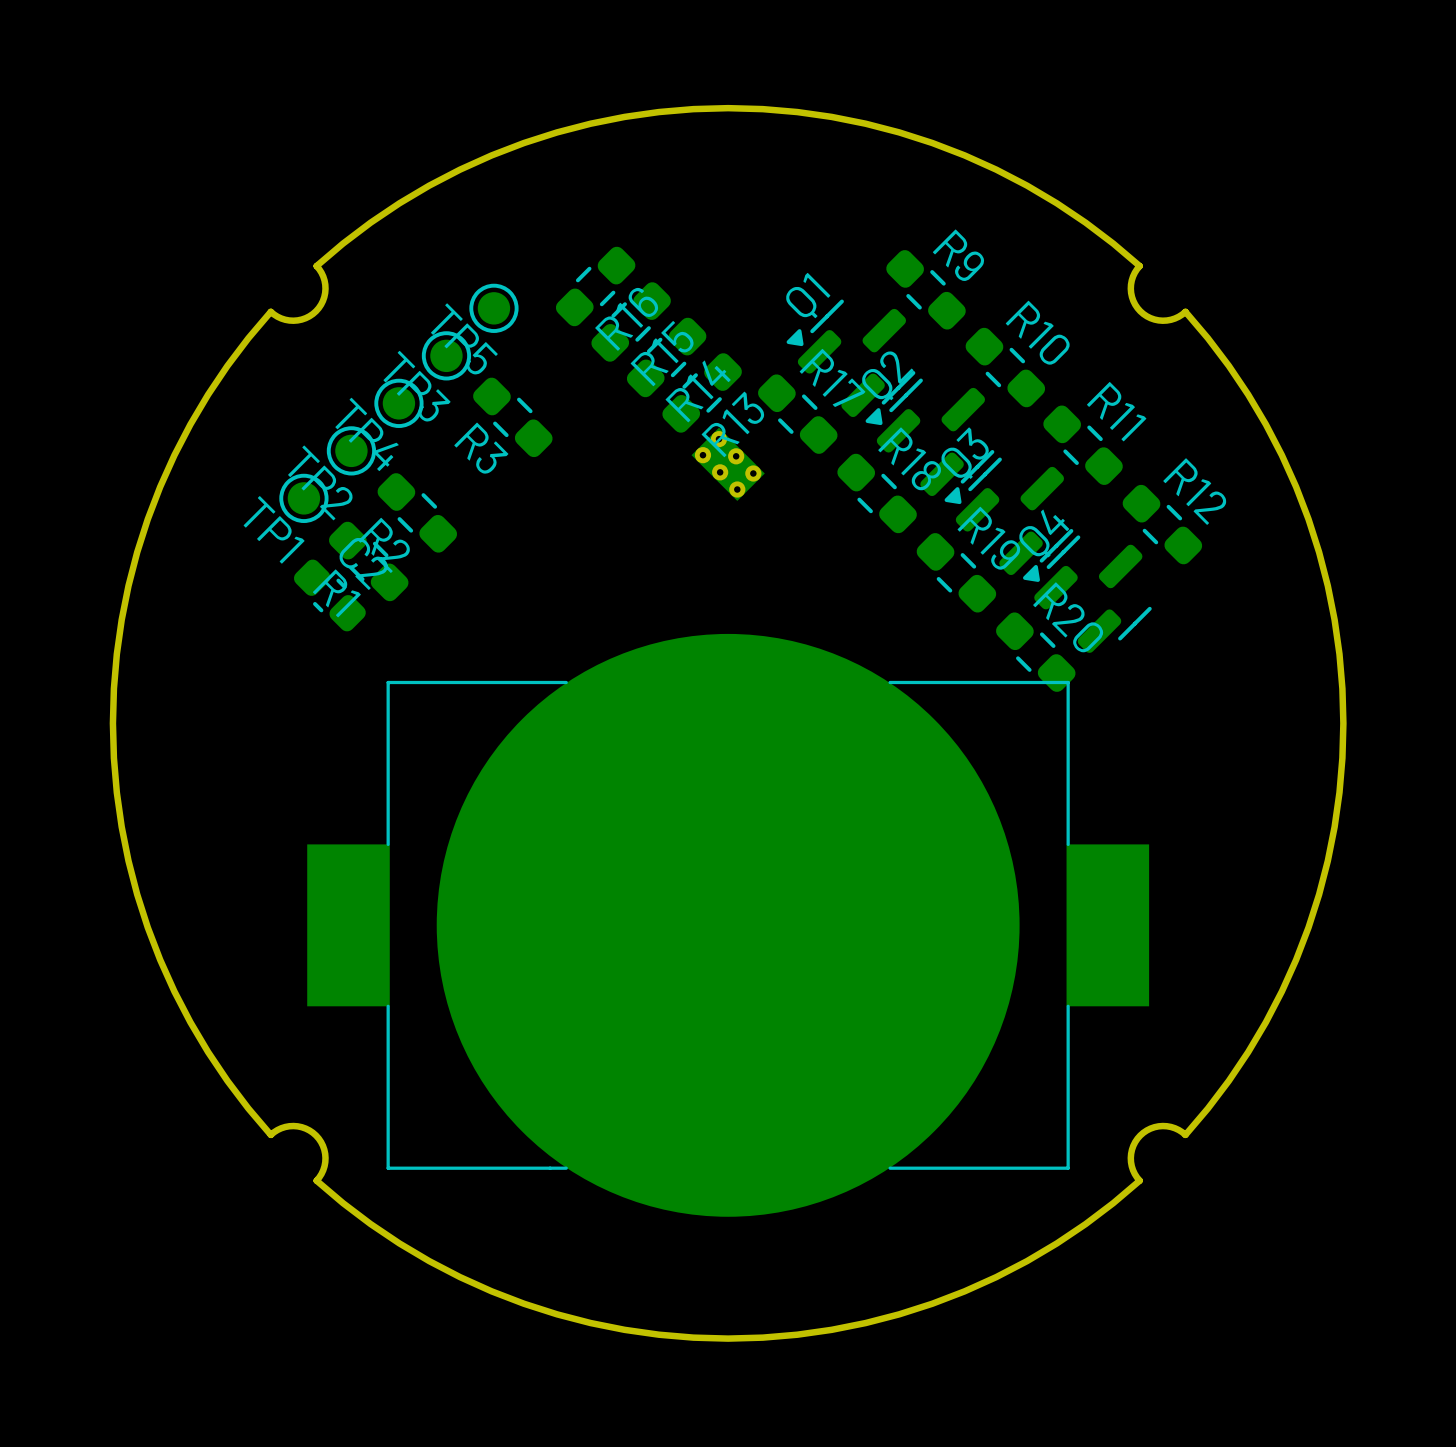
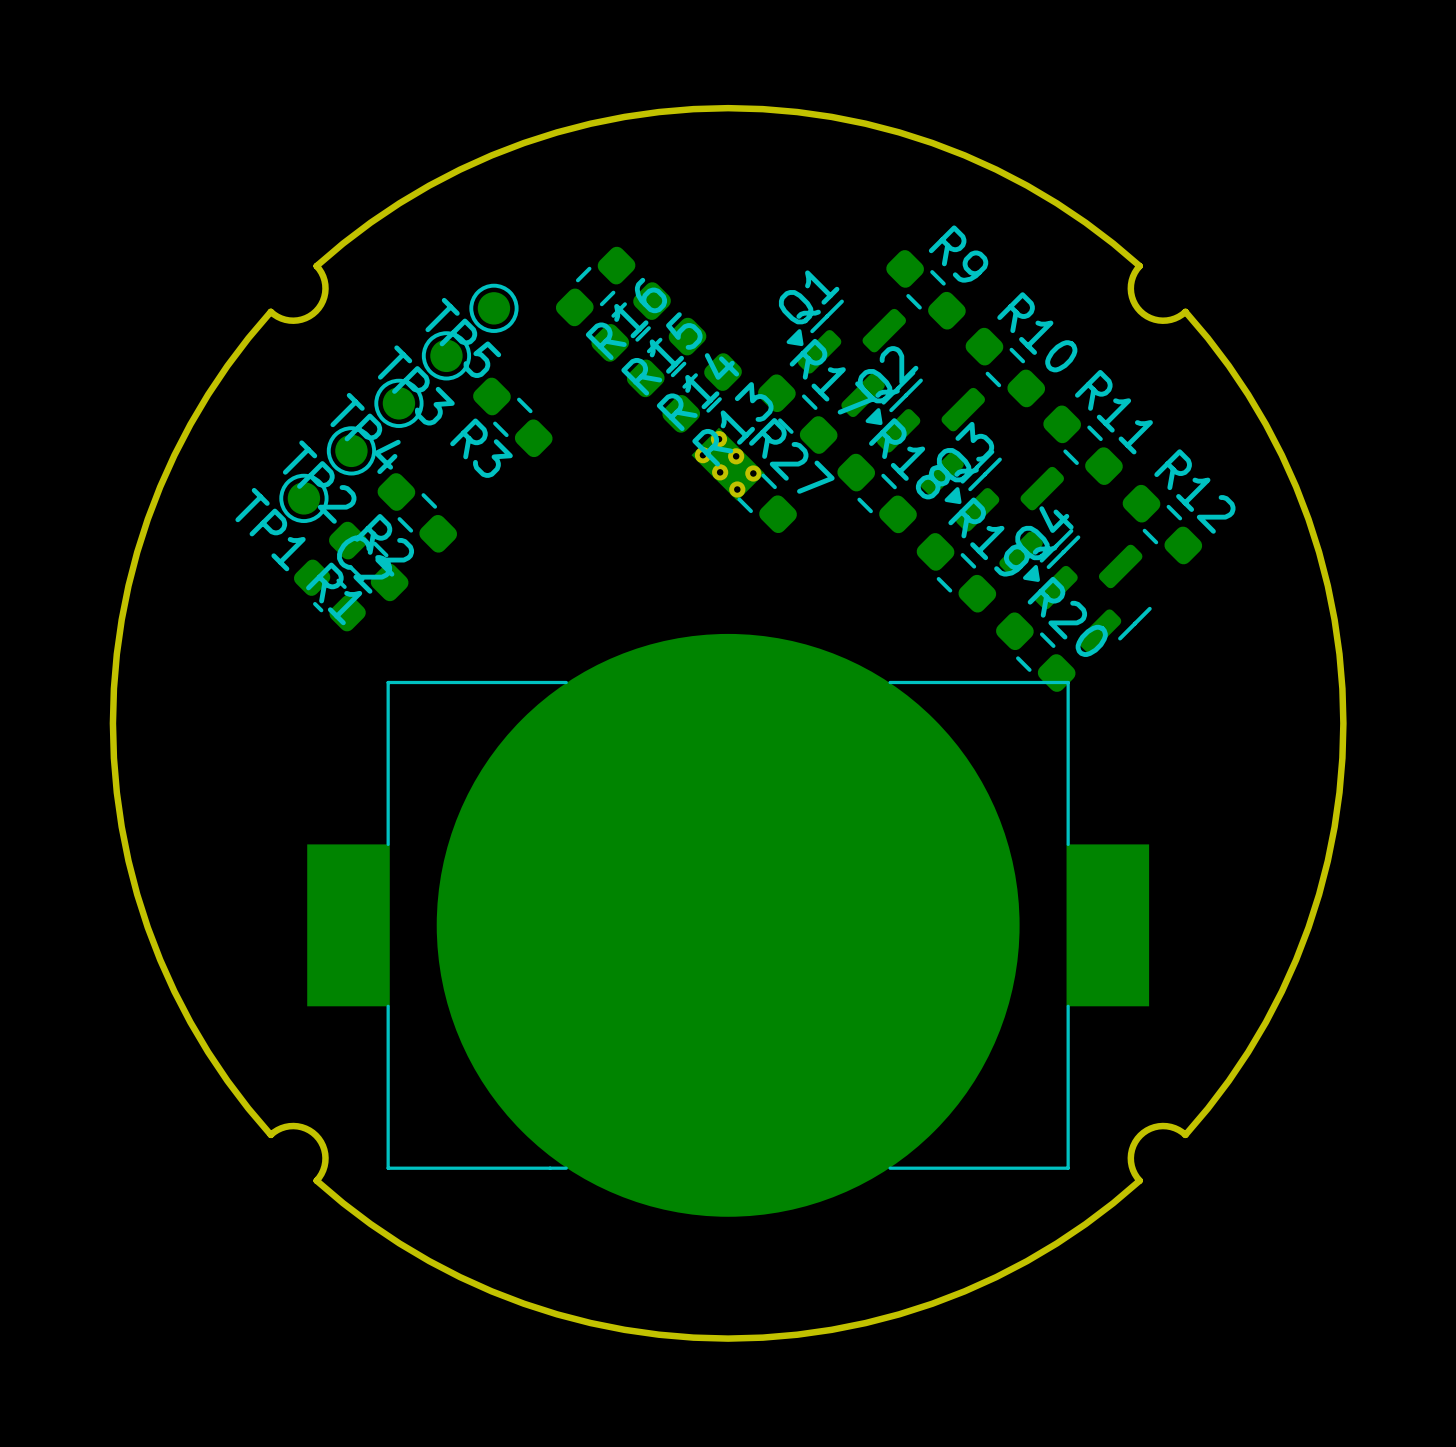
R27: none -> (757, 493)

